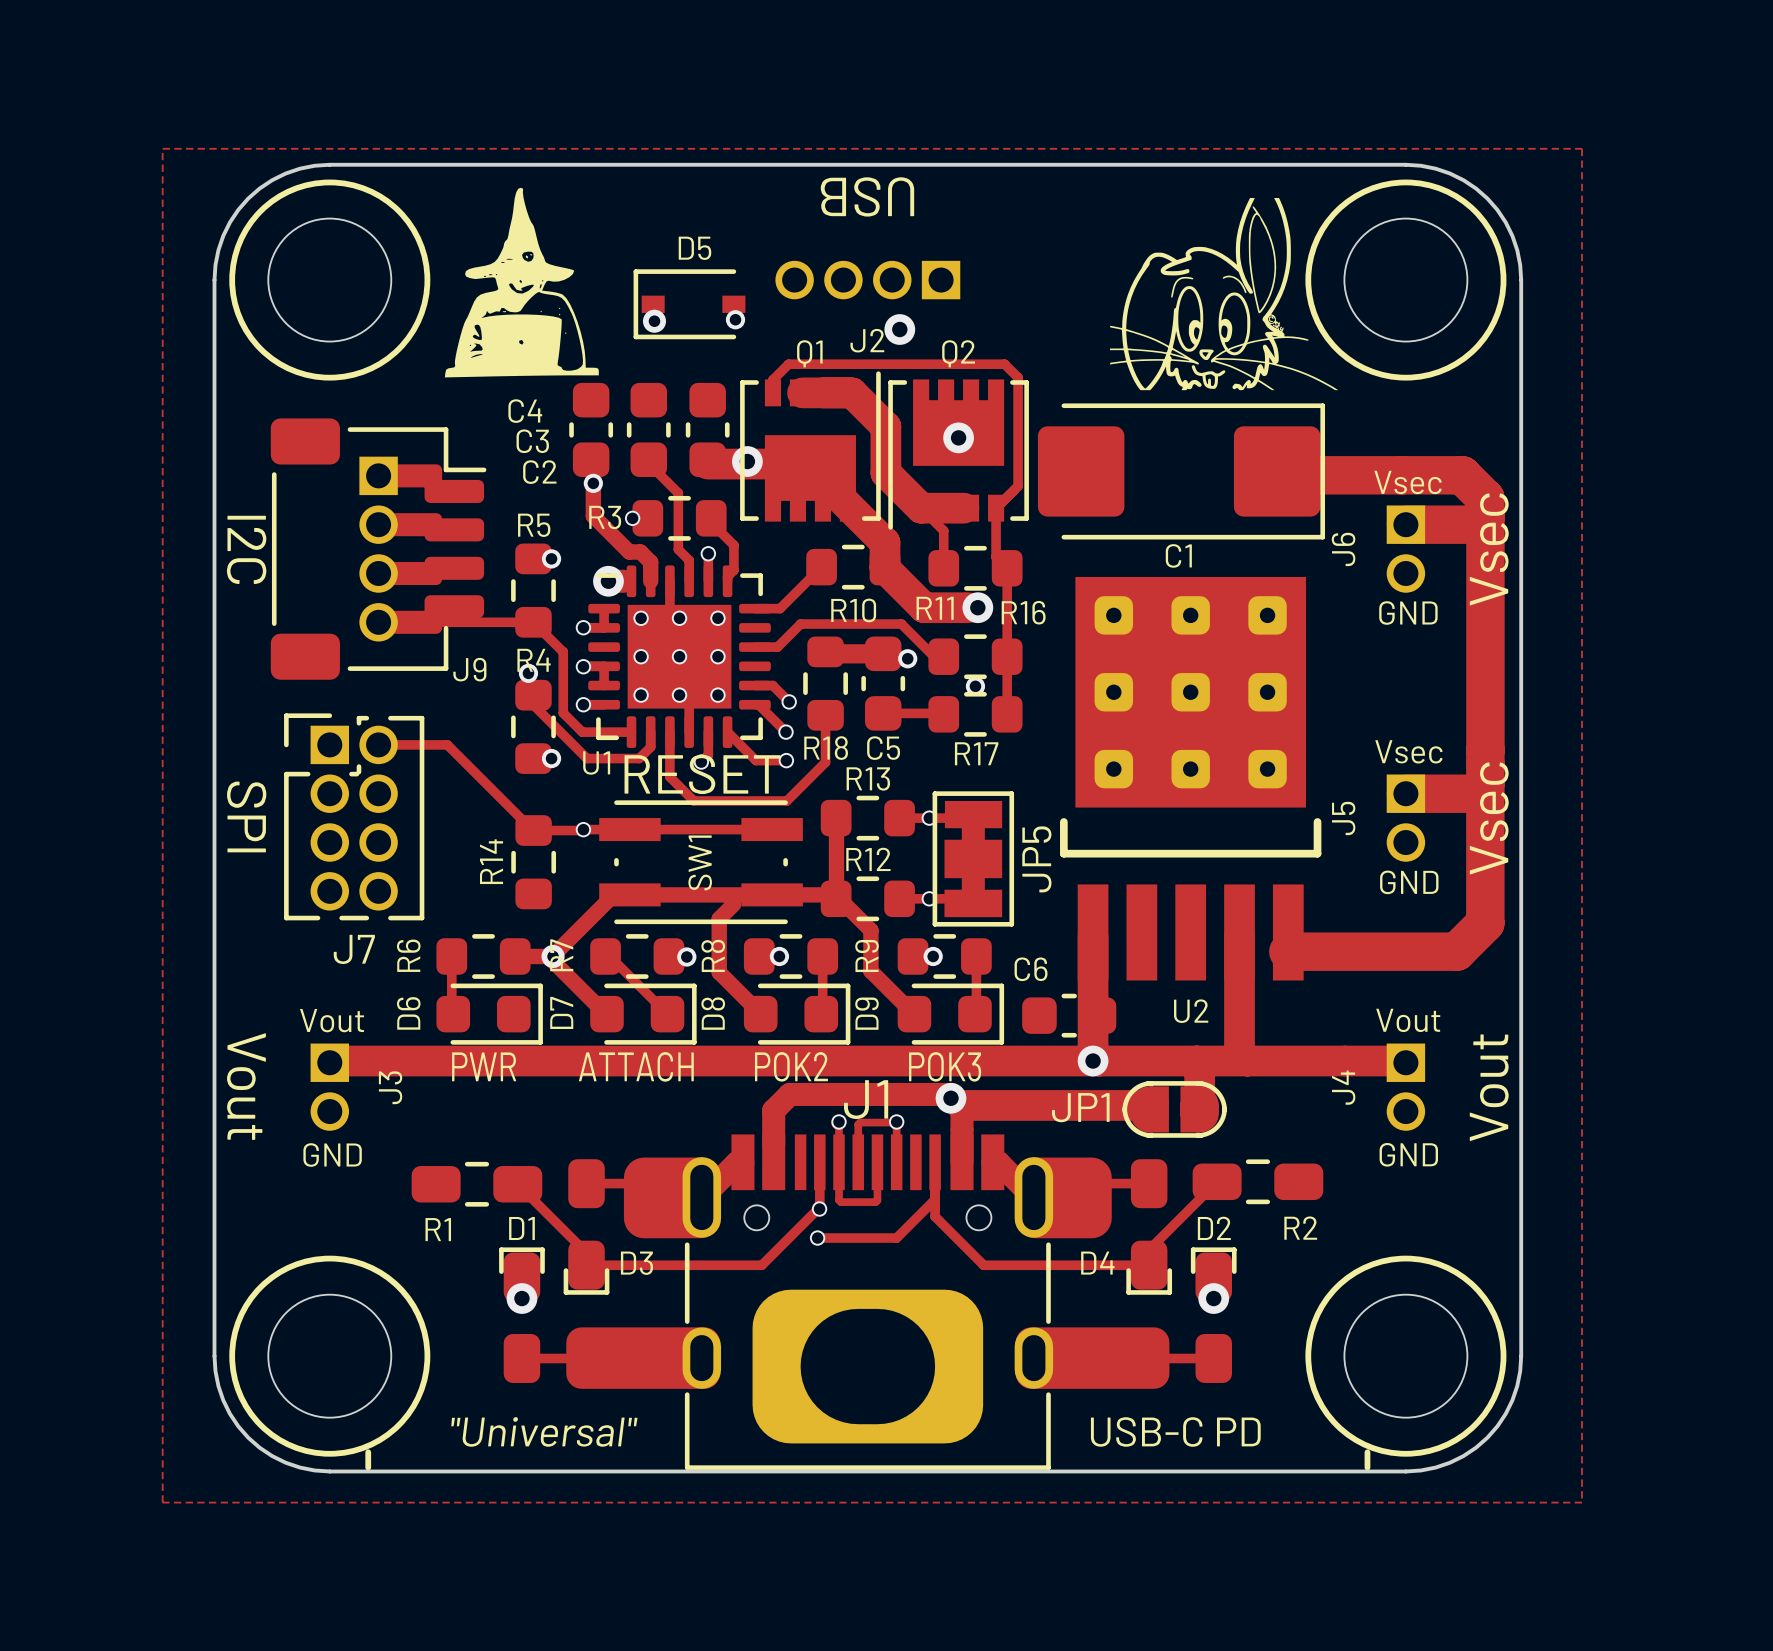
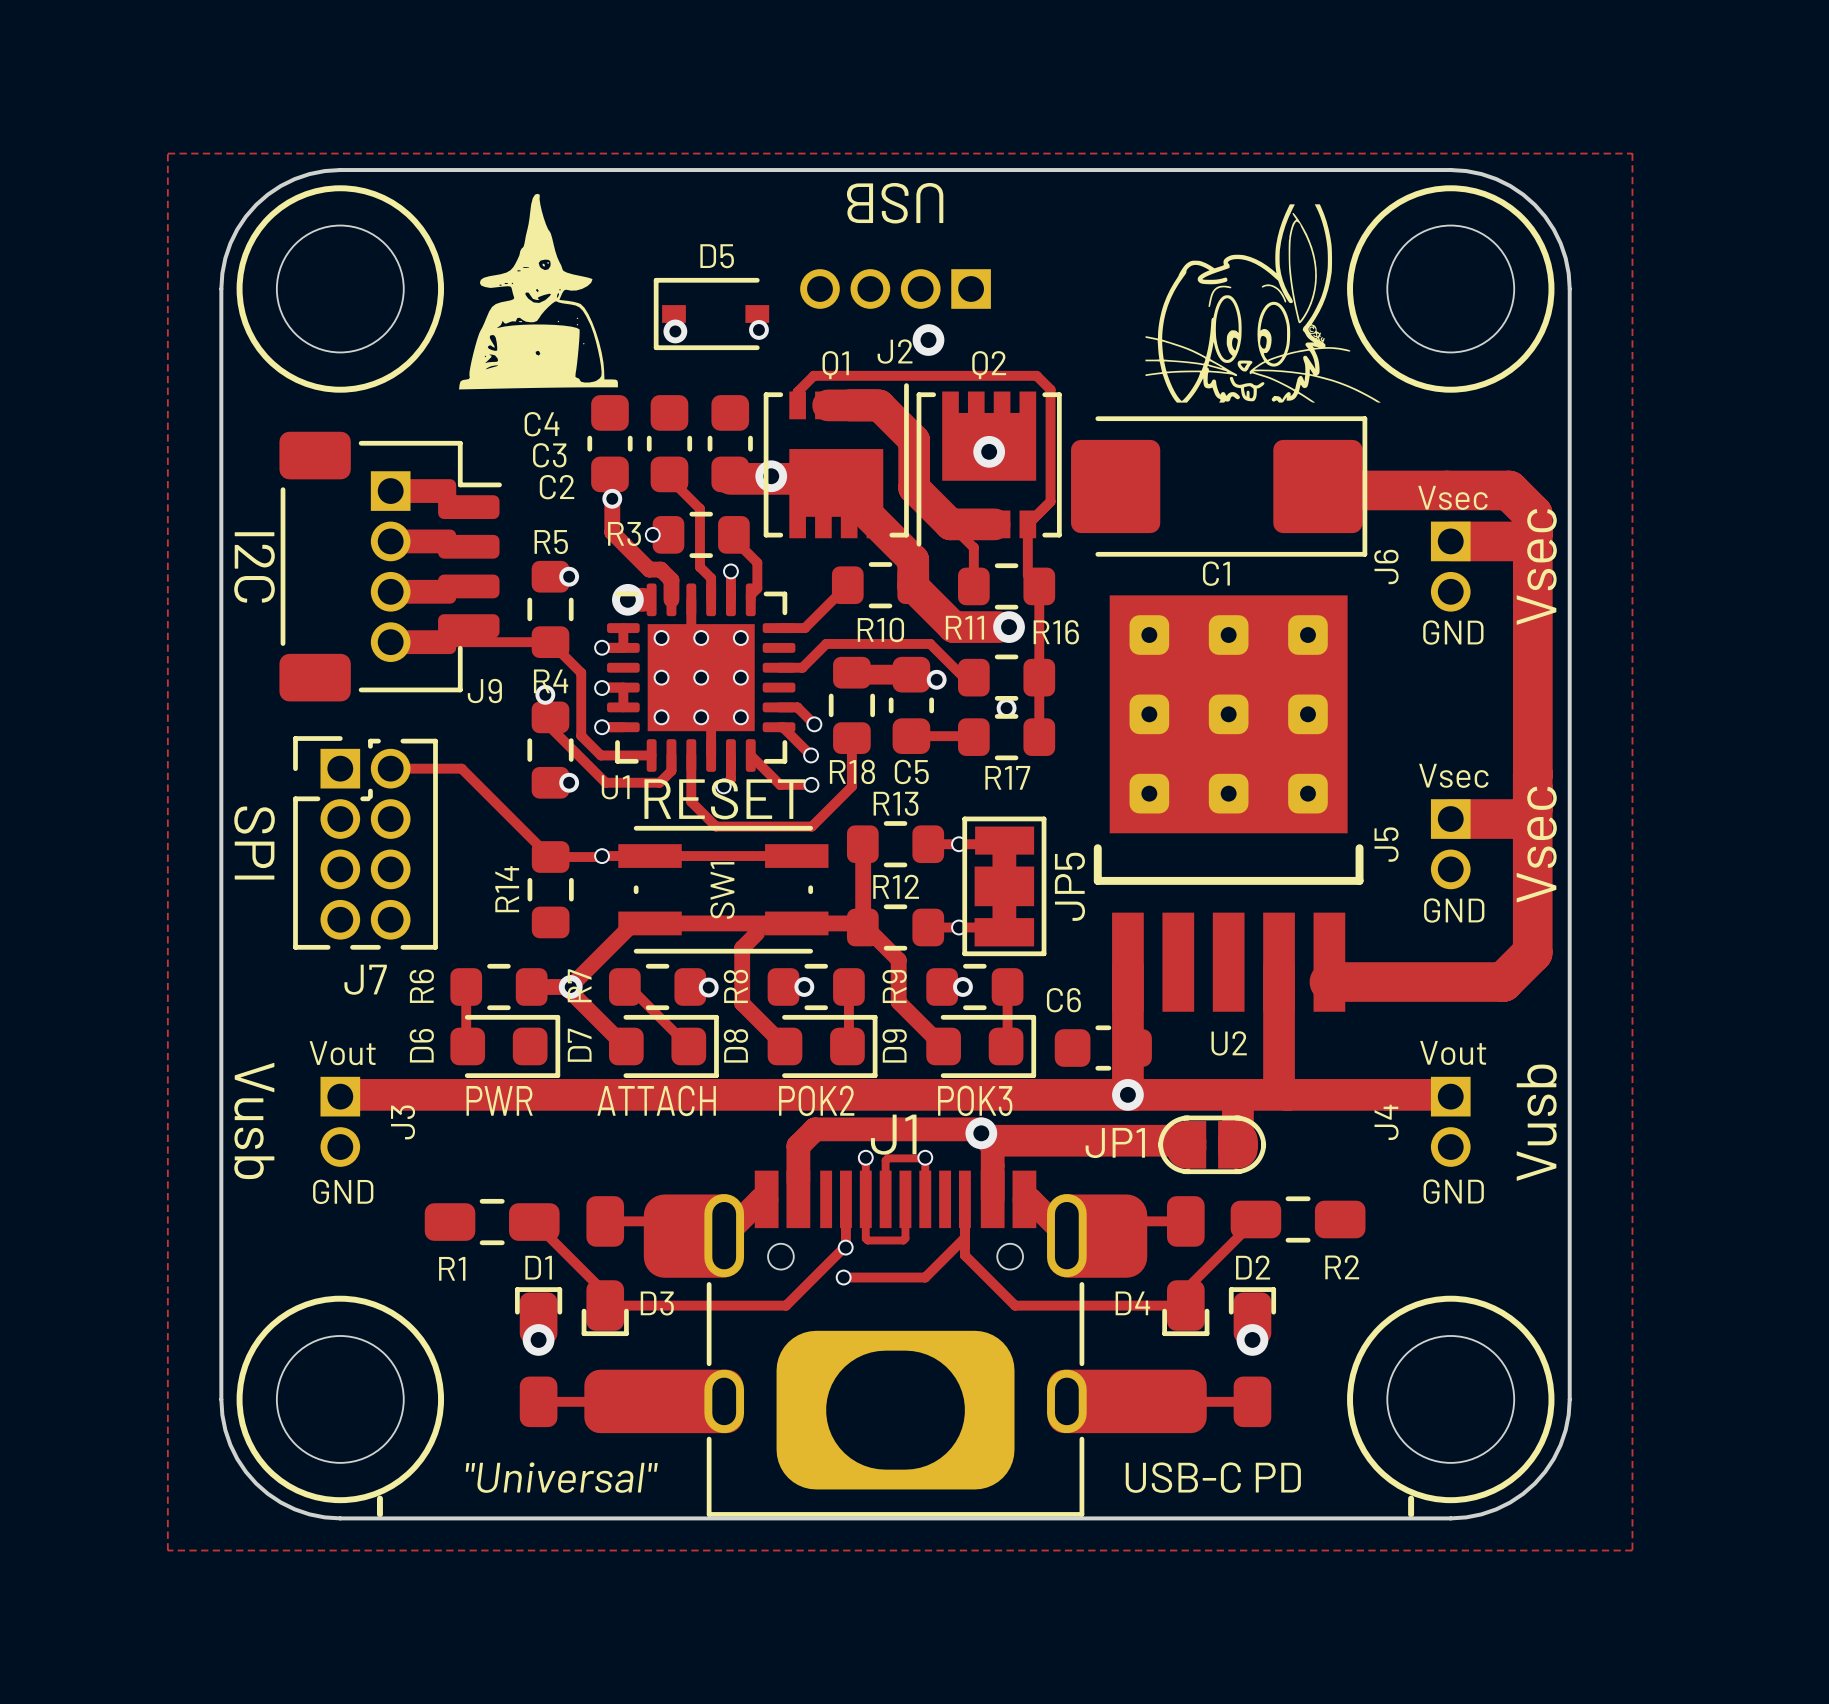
text: Vout (246, 1086) -> Vusb (254, 1120)
text: Vout (1489, 1087) -> Vusb (1536, 1122)

